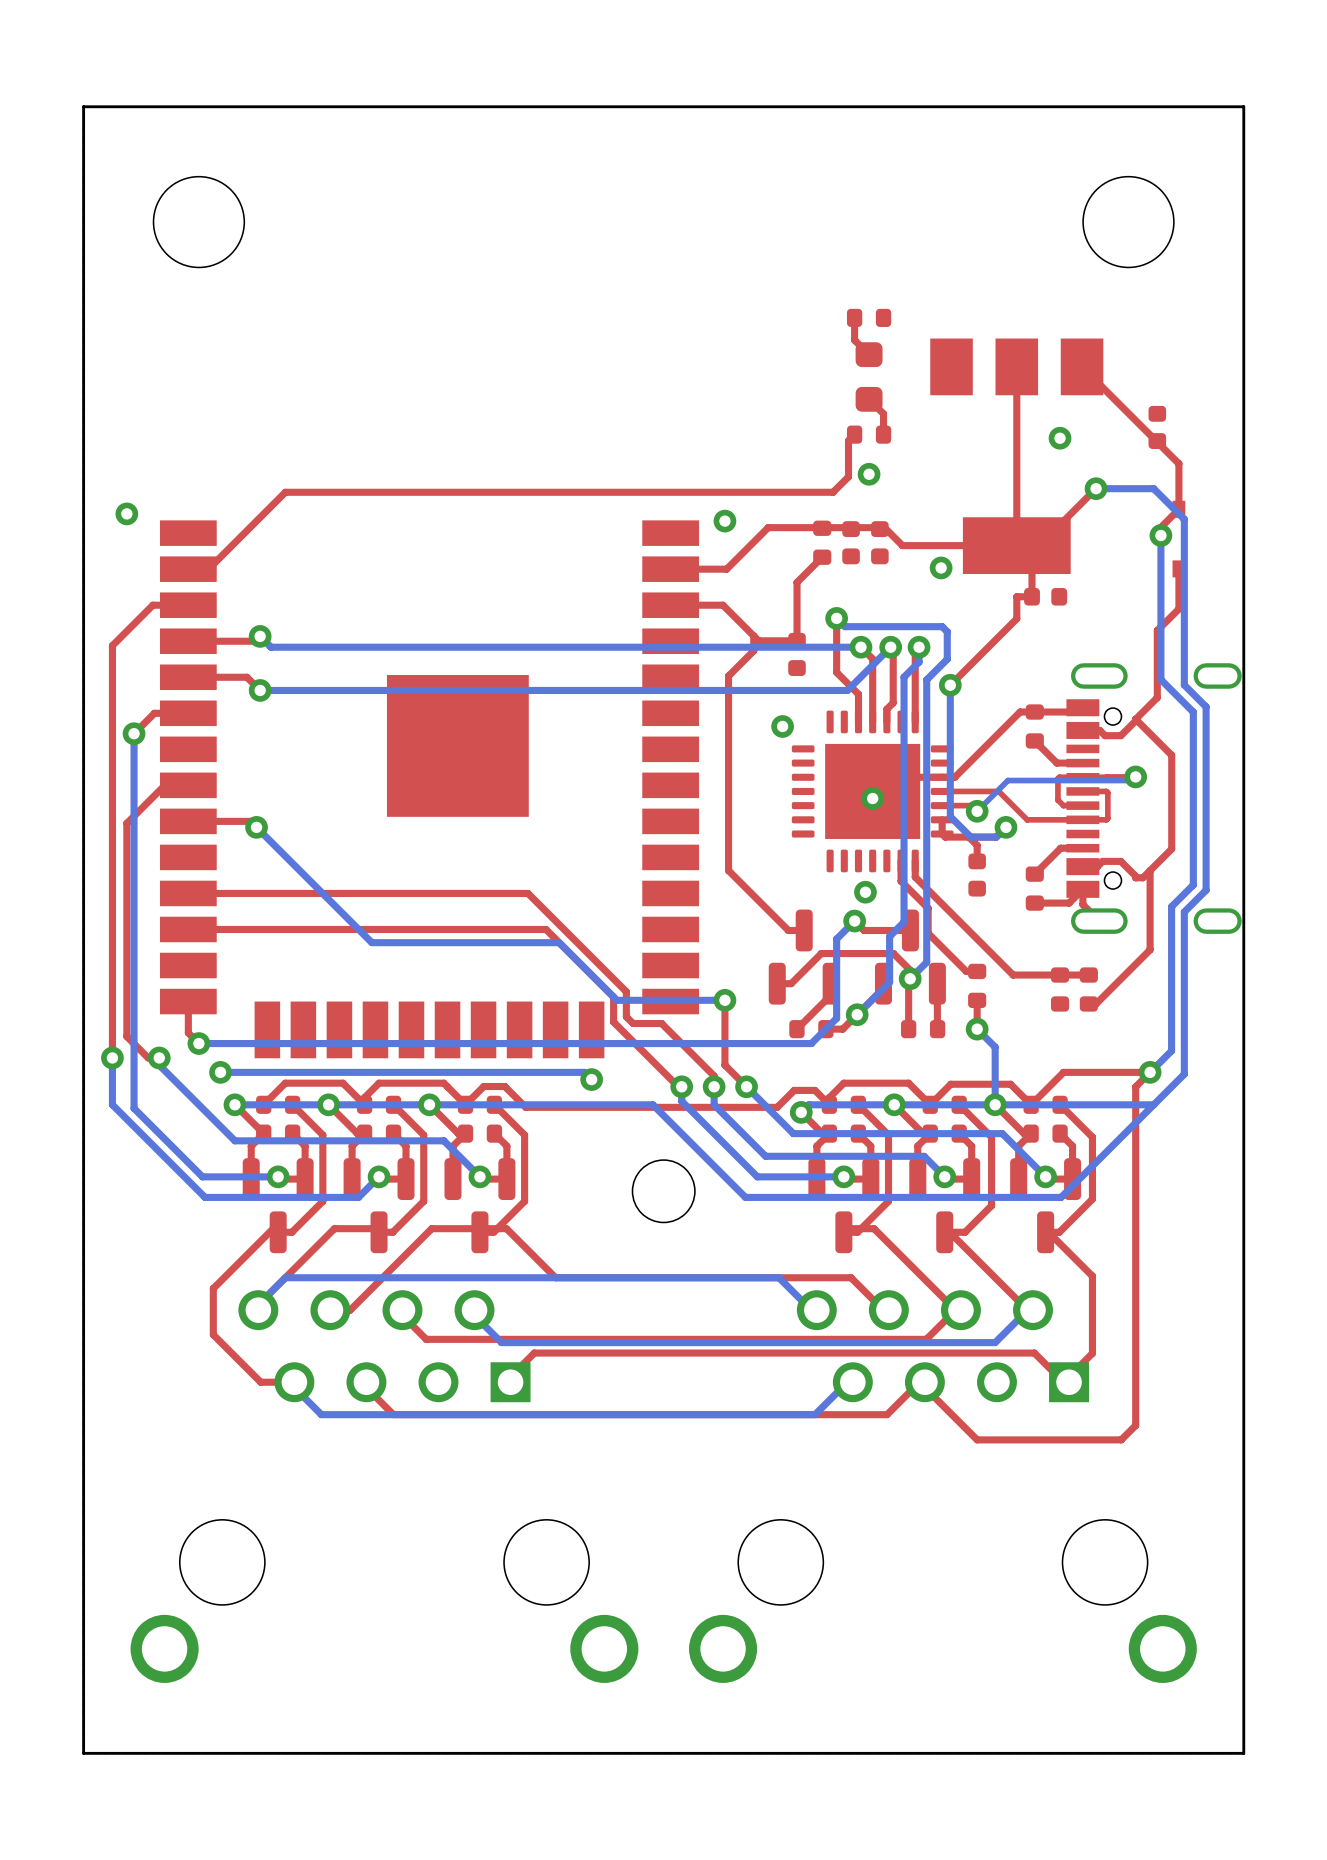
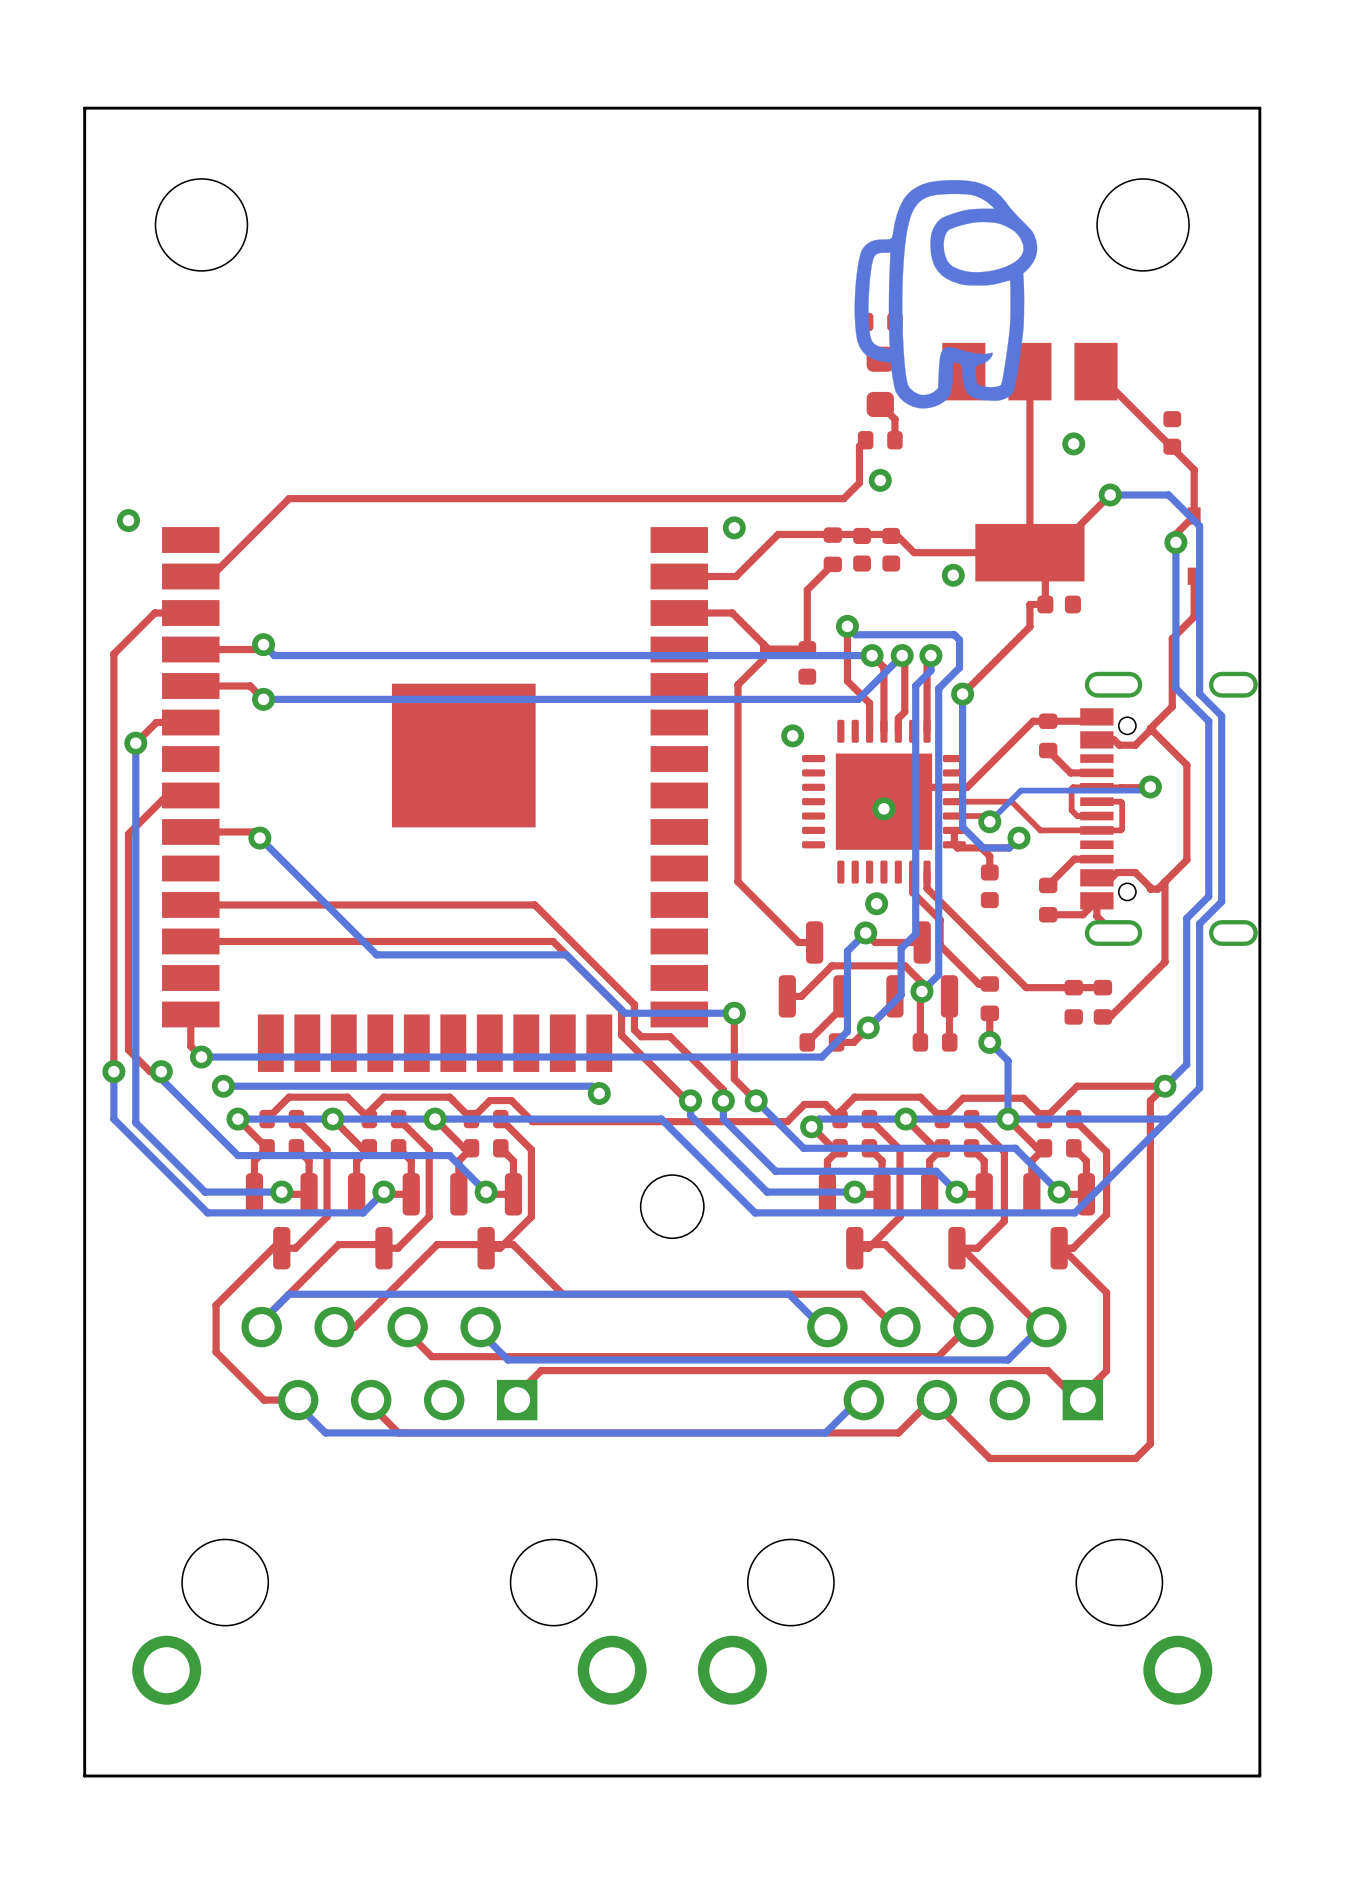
drawing: none -> [854, 180, 1038, 409]

